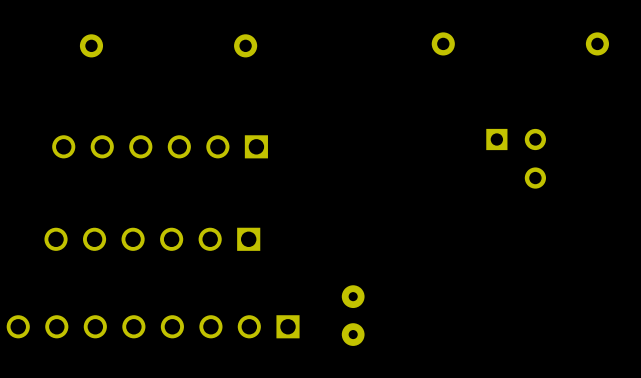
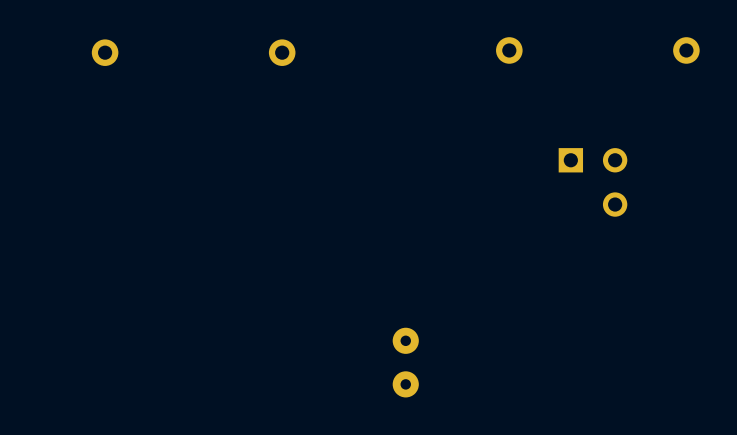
part: (160, 146) -> none
part: (152, 239) -> none
part: (153, 326) -> none

